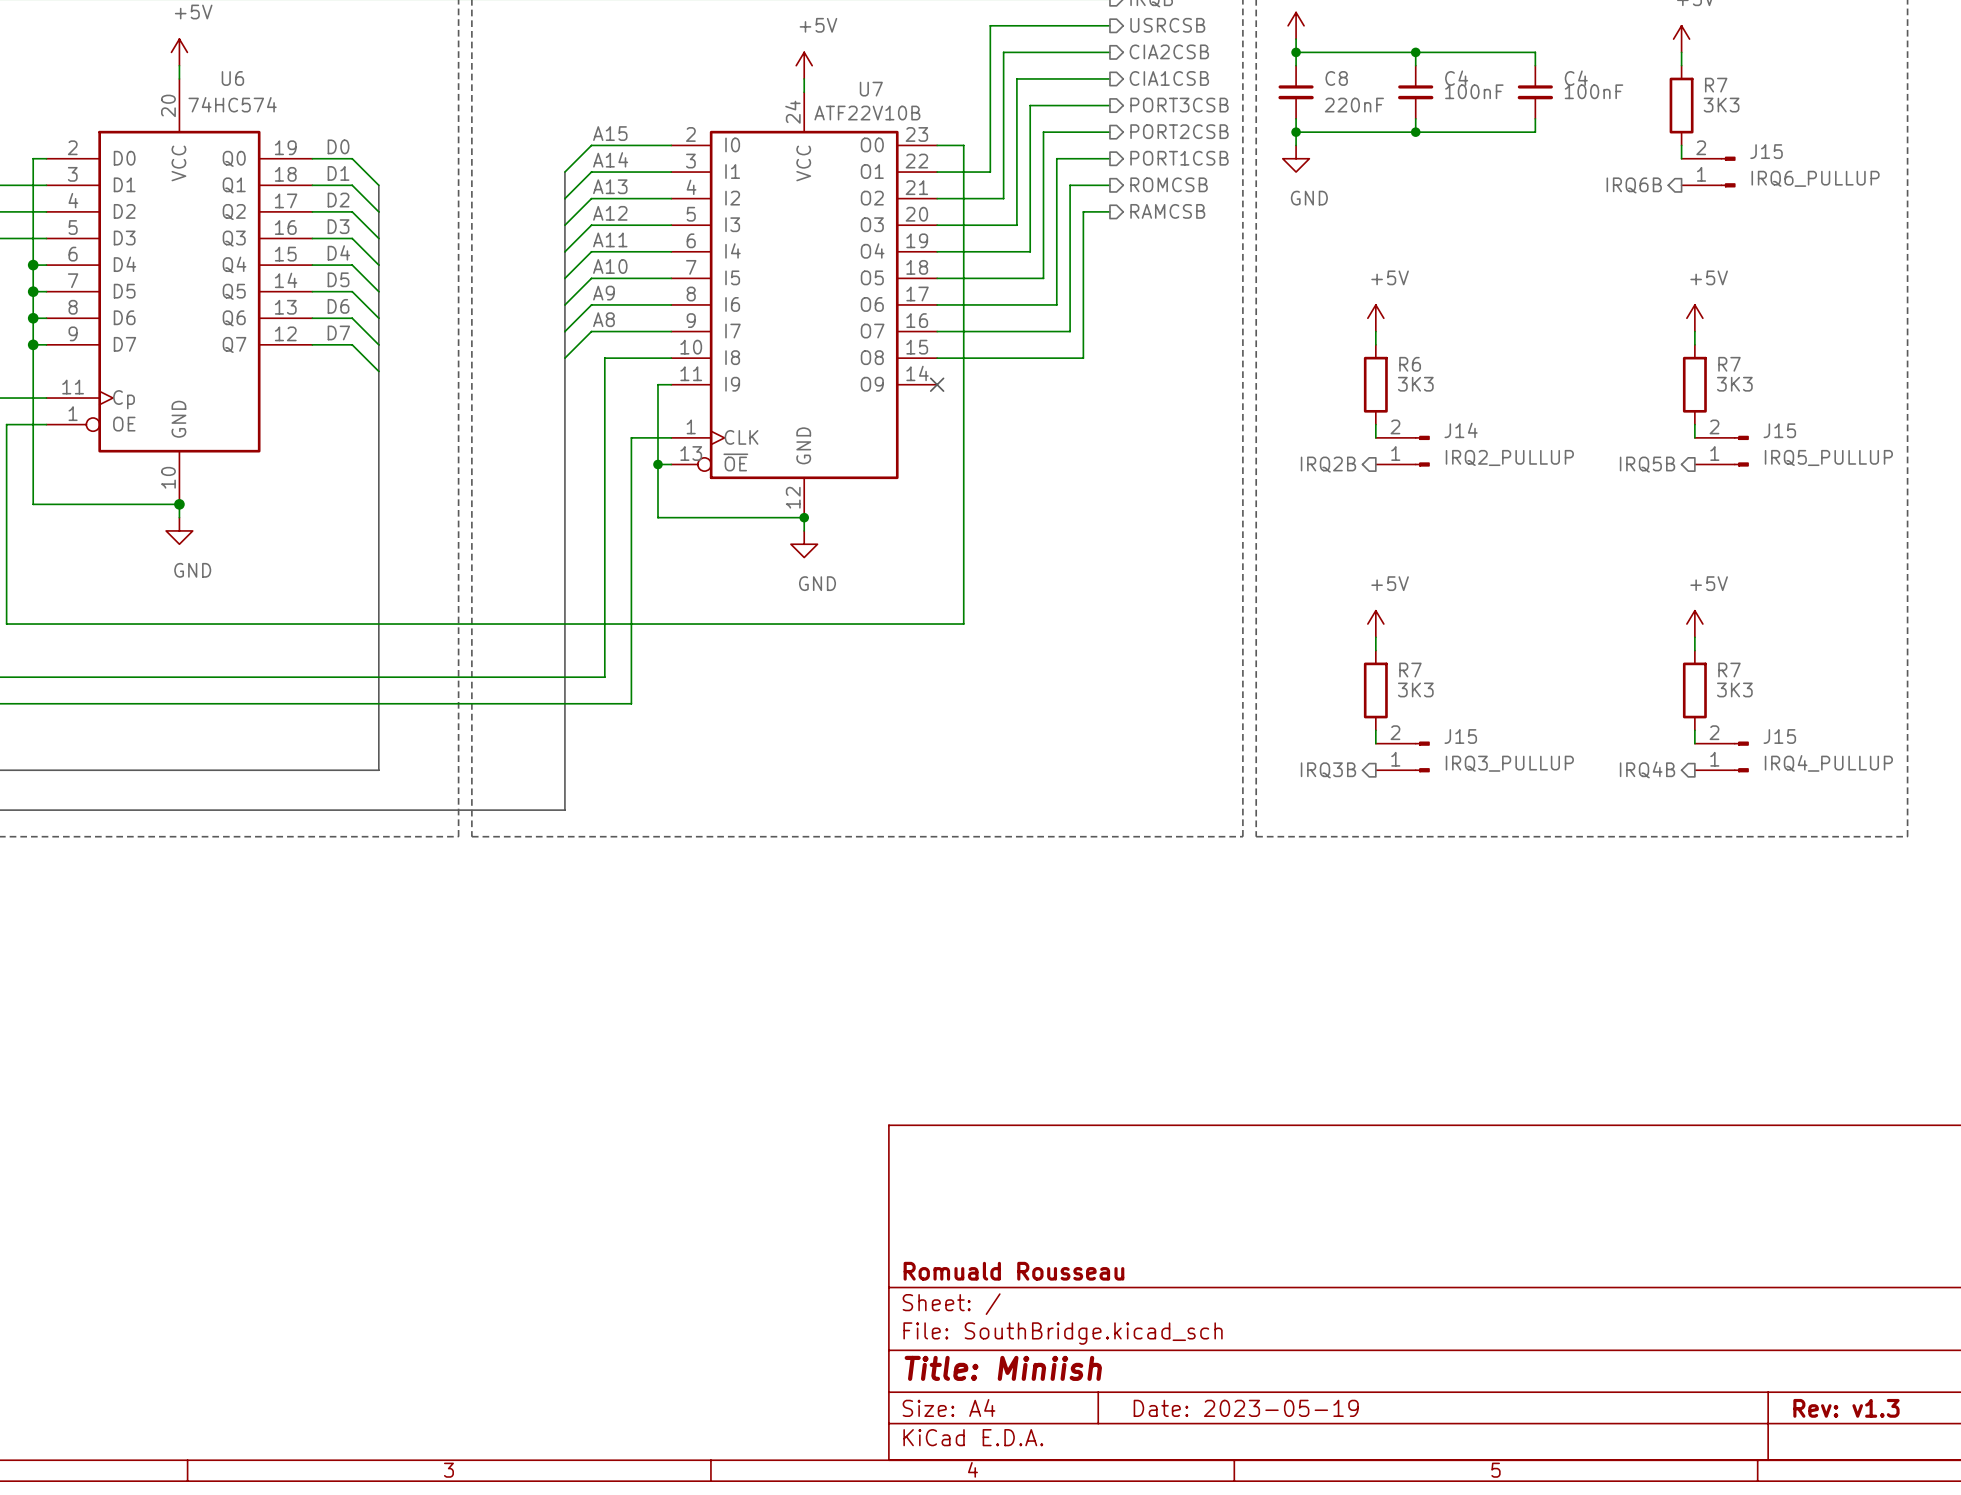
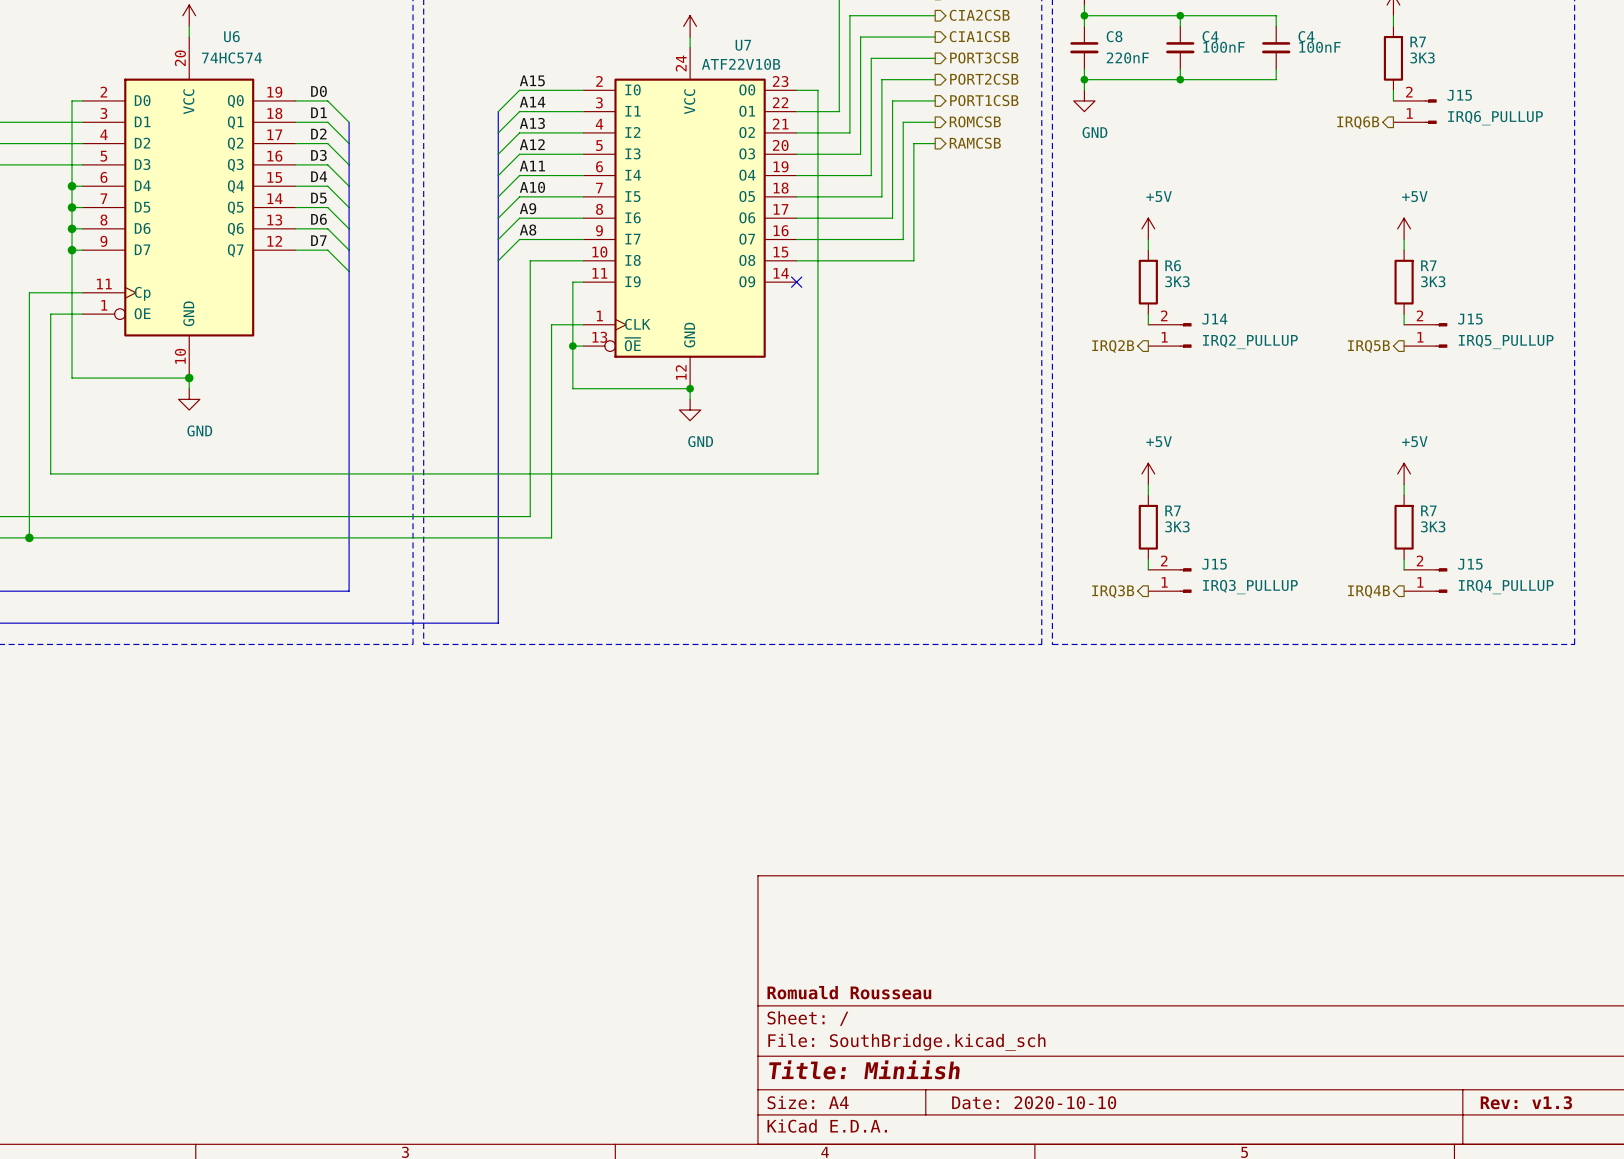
title block: Date: 2023-05-19 (1246, 1408) -> Date: 2020-10-10 (1034, 1102)

